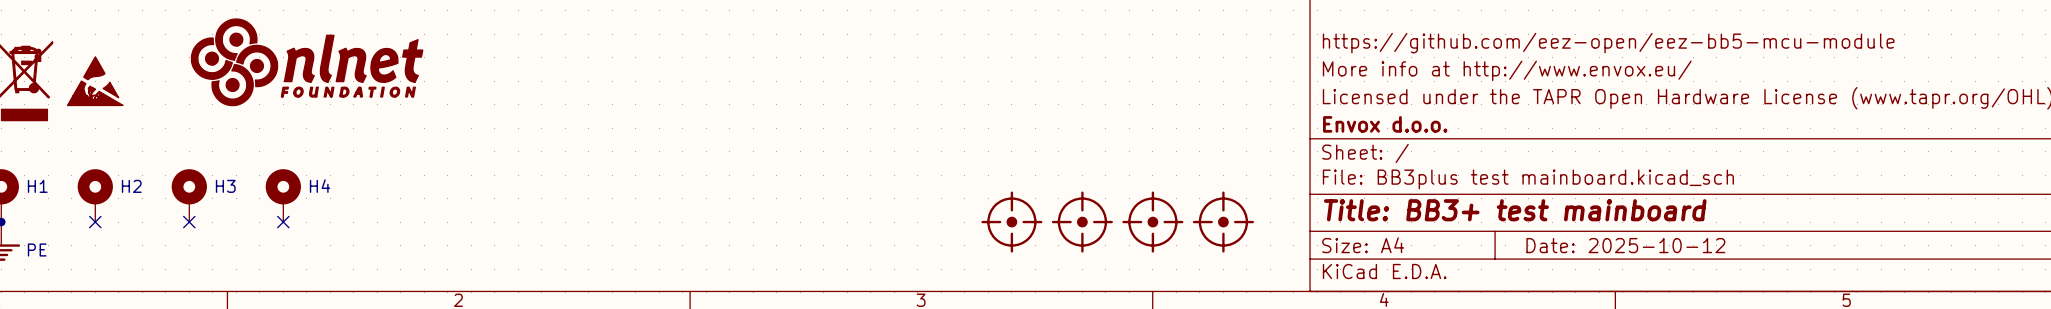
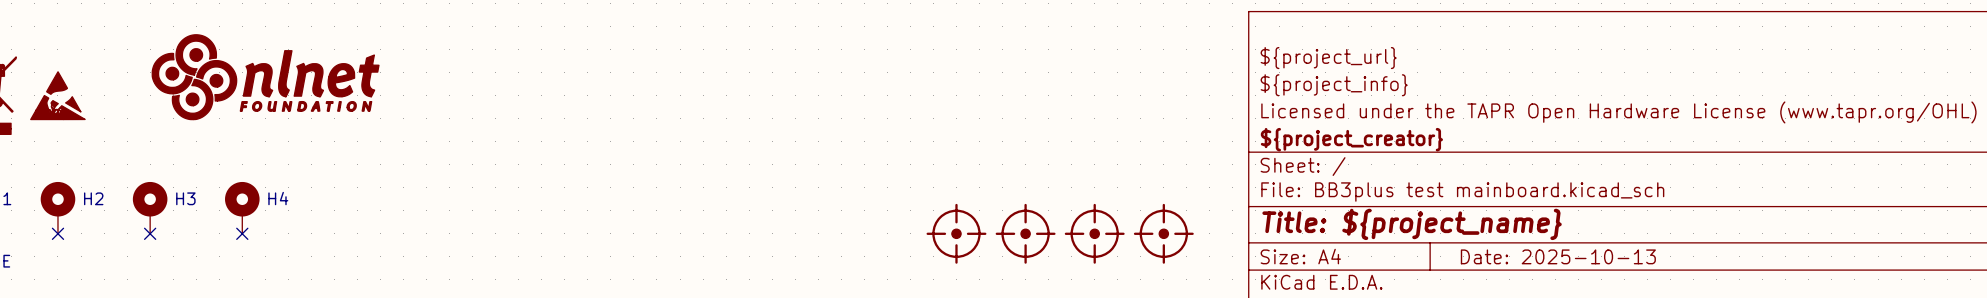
title block: https://github.com/eez-open/eez-bb5-mcu-module (1608, 43) -> ${project_url} (1328, 58)
title block: More info at http://www.envox.eu/ (1507, 70) -> ${project_info} (1334, 85)
title block: Envox d.o.o. (1385, 124) -> ${project_creator} (1351, 139)
title block: Title: BB3+ test mainboard (1515, 210) -> Title: ${project_name} (1412, 224)
title block: Date: 2025-10-12 (1625, 245) -> Date: 2025-10-13 (1558, 256)

